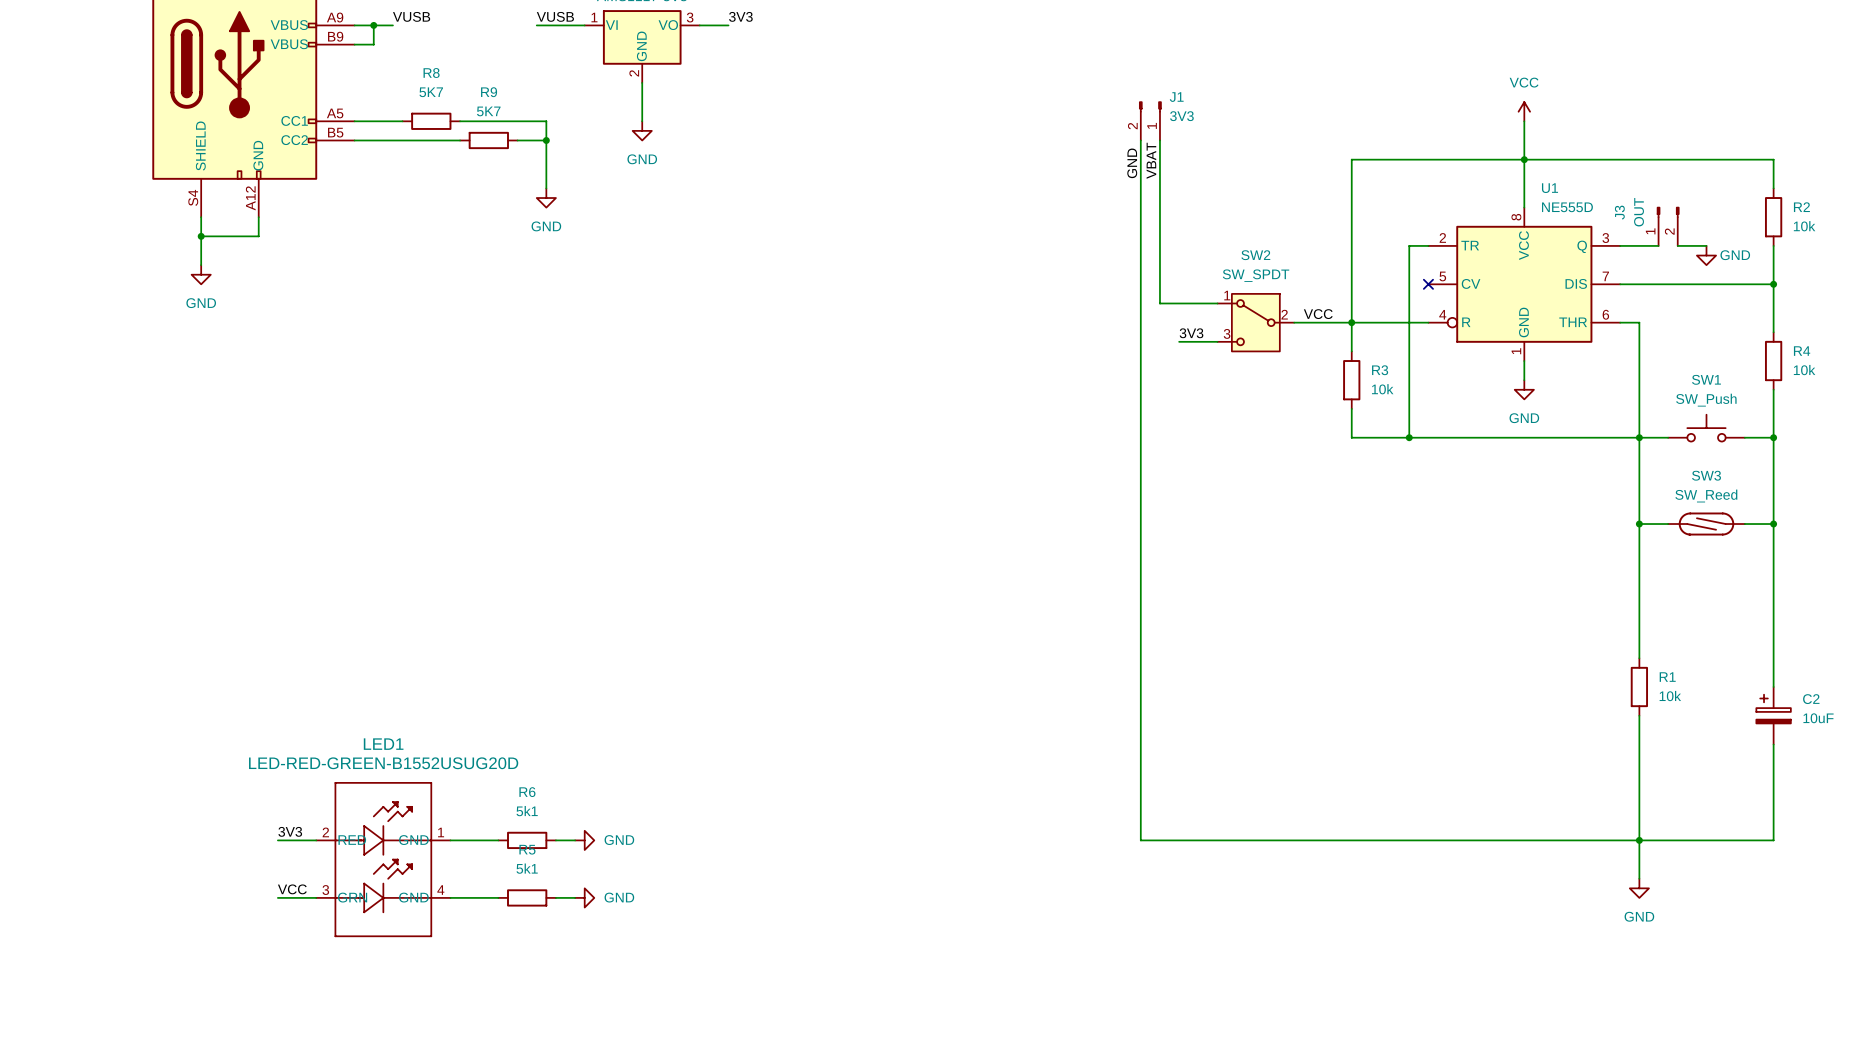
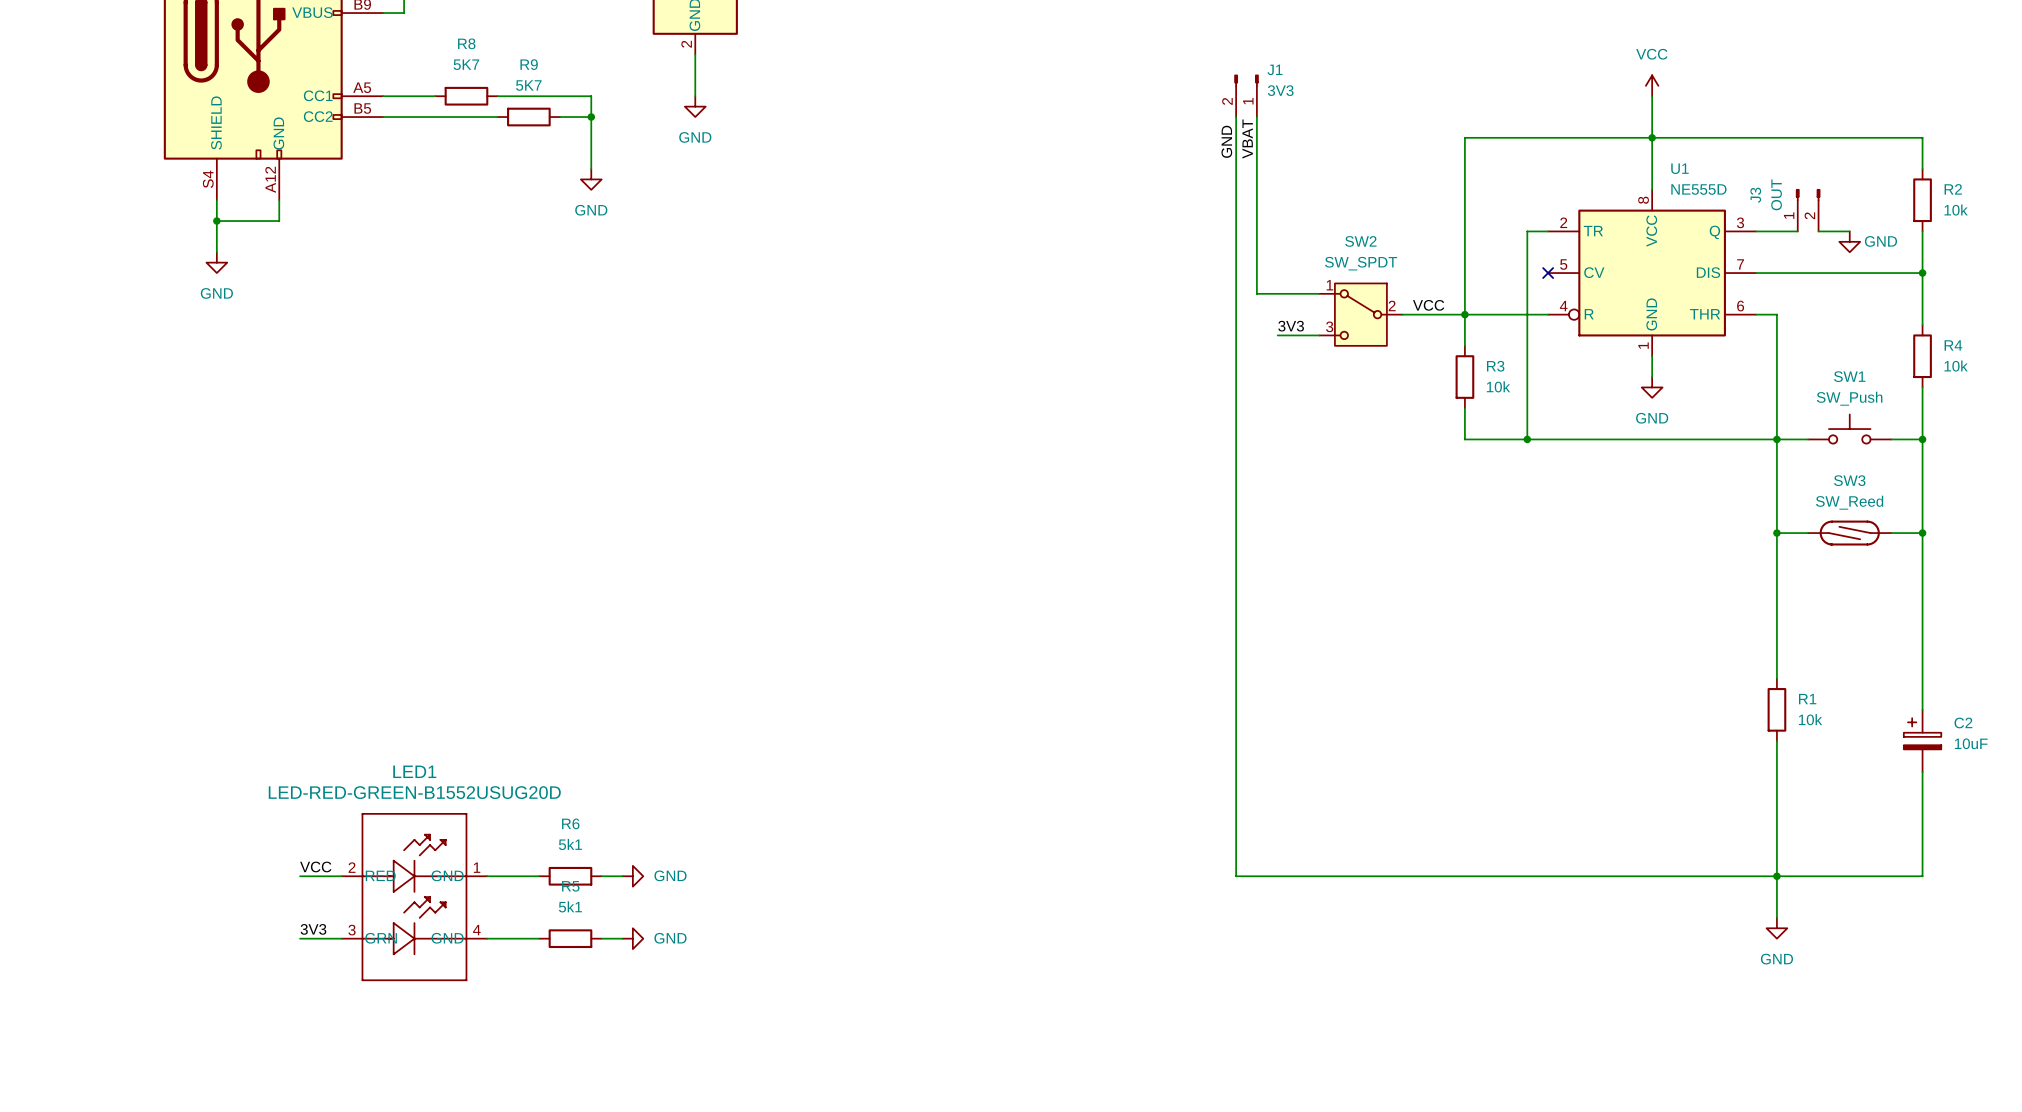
label: 3V3 (290, 831) -> VCC (315, 866)
label: VCC (292, 889) -> 3V3 (313, 929)

